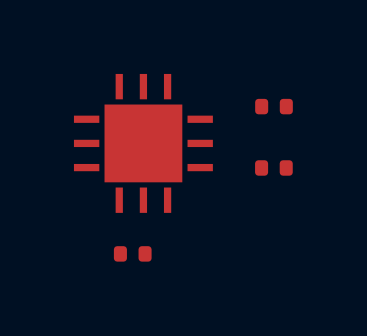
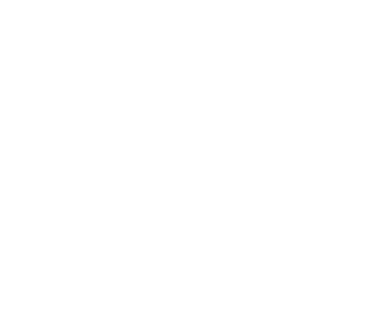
part: (274, 106) -> none
part: (143, 143) -> none
part: (273, 167) -> none
part: (132, 253) -> none

